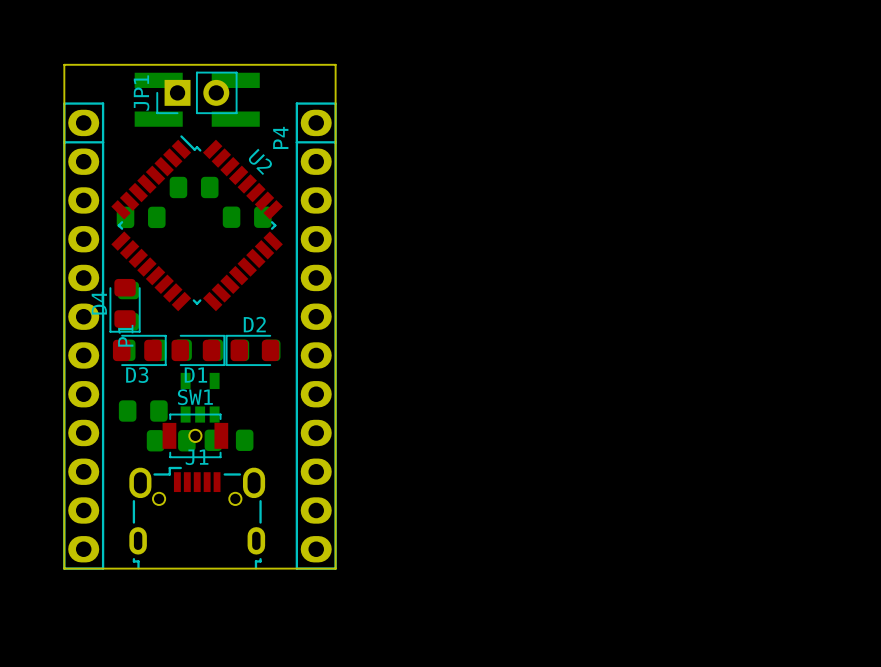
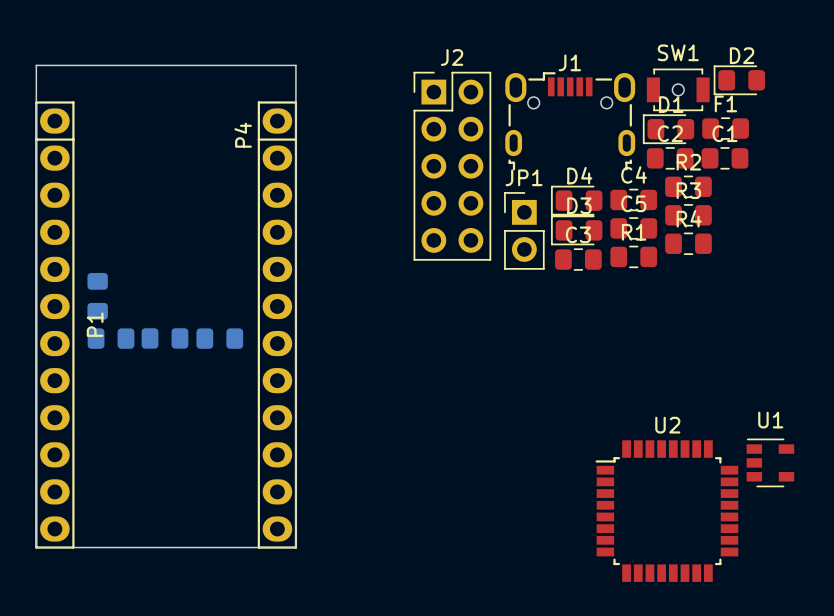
JP1 rotation: 0° (196, 92) -> 90° clockwise (524, 230)
JP1 position: (196, 92) -> (524, 230)
part: (197, 99) -> none
F1: none -> (725, 128)
C2: none -> (670, 158)
C1: none -> (724, 158)
J2: none -> (452, 166)
part: (194, 187) -> none
R2: none -> (688, 186)
C4: none -> (633, 199)
part: (141, 217) -> none
part: (247, 217) -> none
R3: none -> (688, 215)
U2 rotation: 0° (197, 223) -> 45° counterclockwise (666, 511)
U2 position: (197, 223) -> (666, 511)
C5: none -> (633, 228)
R4: none -> (688, 243)
R1: none -> (633, 256)
C3: none -> (578, 259)
D4 rotation: 0° (125, 305) -> 90° clockwise (576, 200)
D4 position: (125, 305) -> (576, 200)
D3 rotation: 0° (139, 350) -> 180° (576, 230)
D3 position: (139, 350) -> (576, 230)
D1 rotation: 0° (198, 350) -> 180° (668, 129)
D1 position: (198, 350) -> (668, 129)
D2 position: (252, 350) -> (739, 80)
part: (200, 397) -> none
part: (143, 411) -> none
SW1 position: (195, 435) -> (678, 89)
part: (171, 440) -> none
part: (229, 440) -> none
U1: none -> (770, 462)
J1 position: (197, 518) -> (570, 121)

